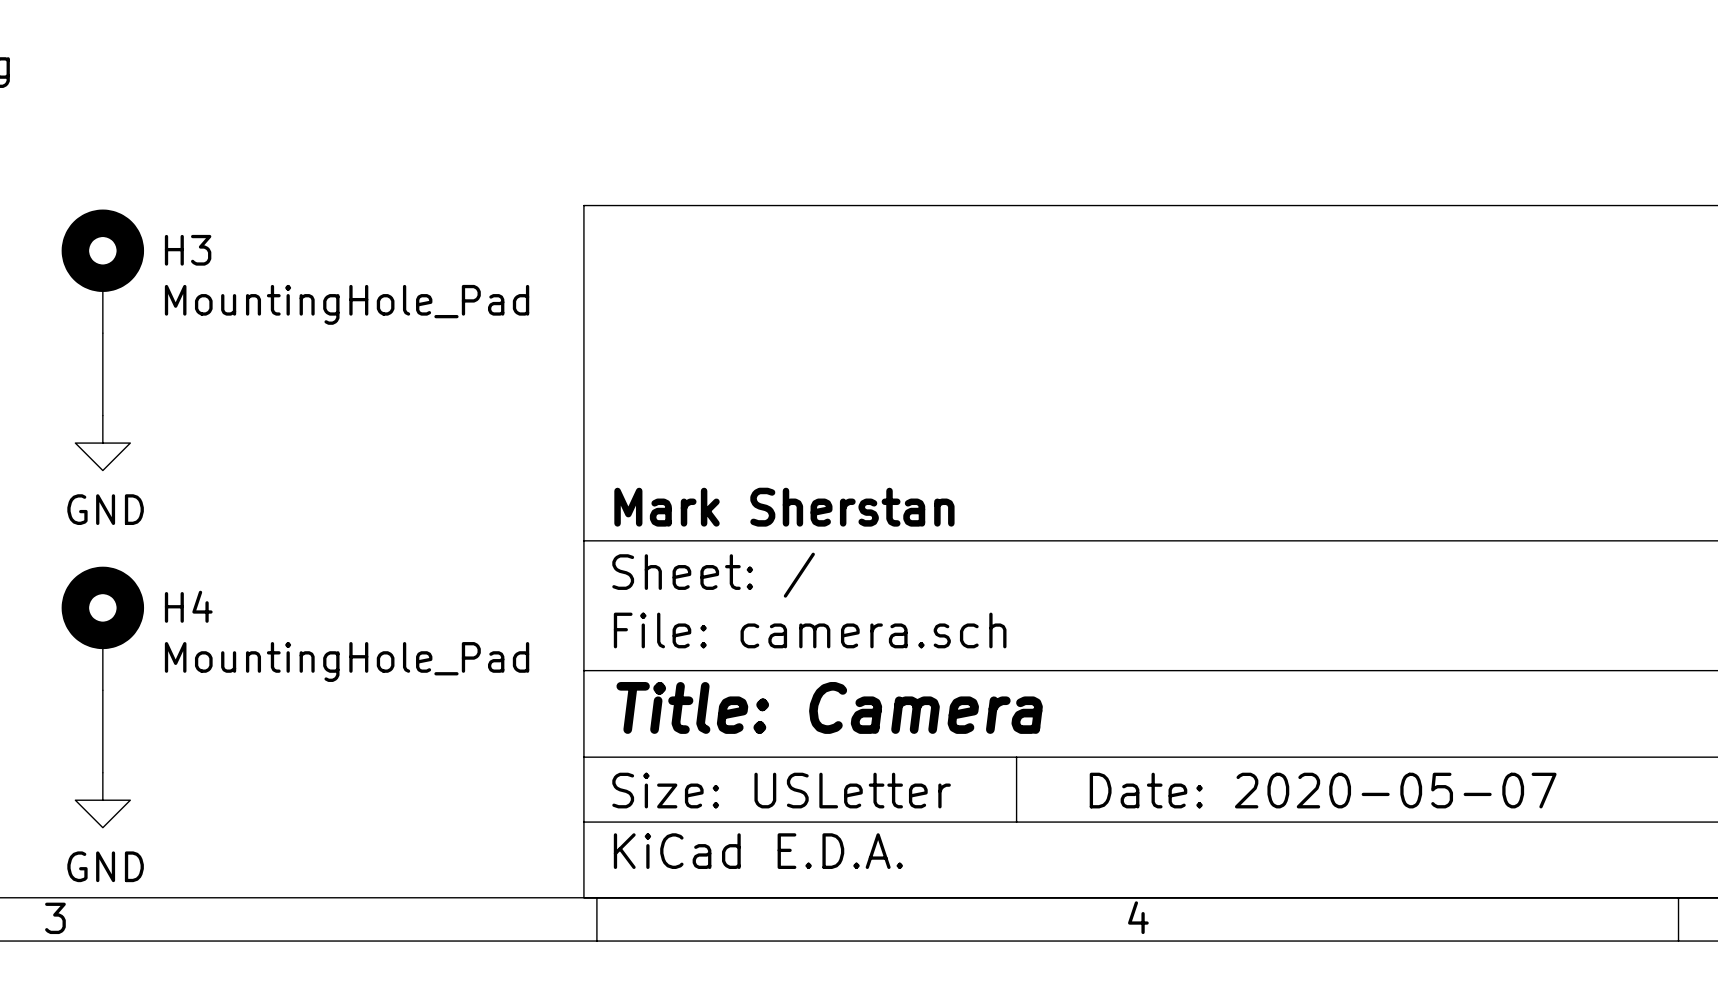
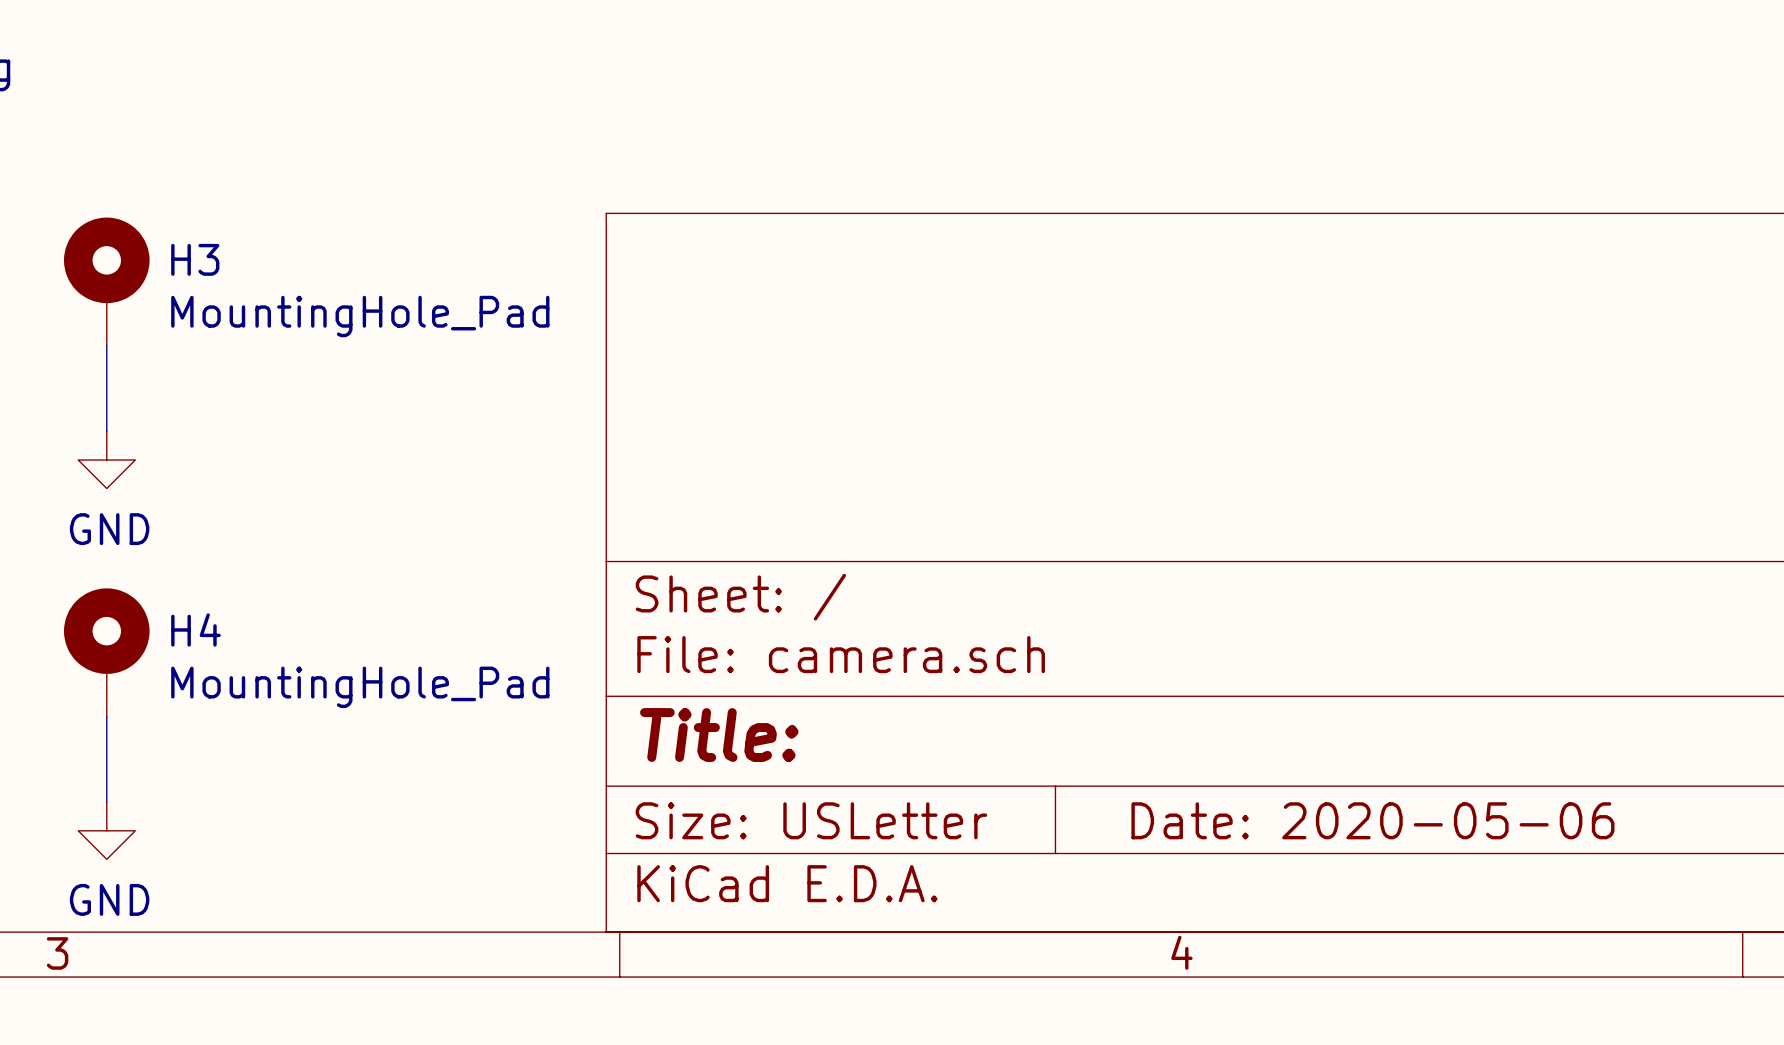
title block: Mark Sherstan (784, 507) -> none
title block: Title: Camera (829, 707) -> Title: (719, 735)
title block: Date: 2020-05-07 (1323, 790) -> Date: 2020-05-06 (1372, 820)

